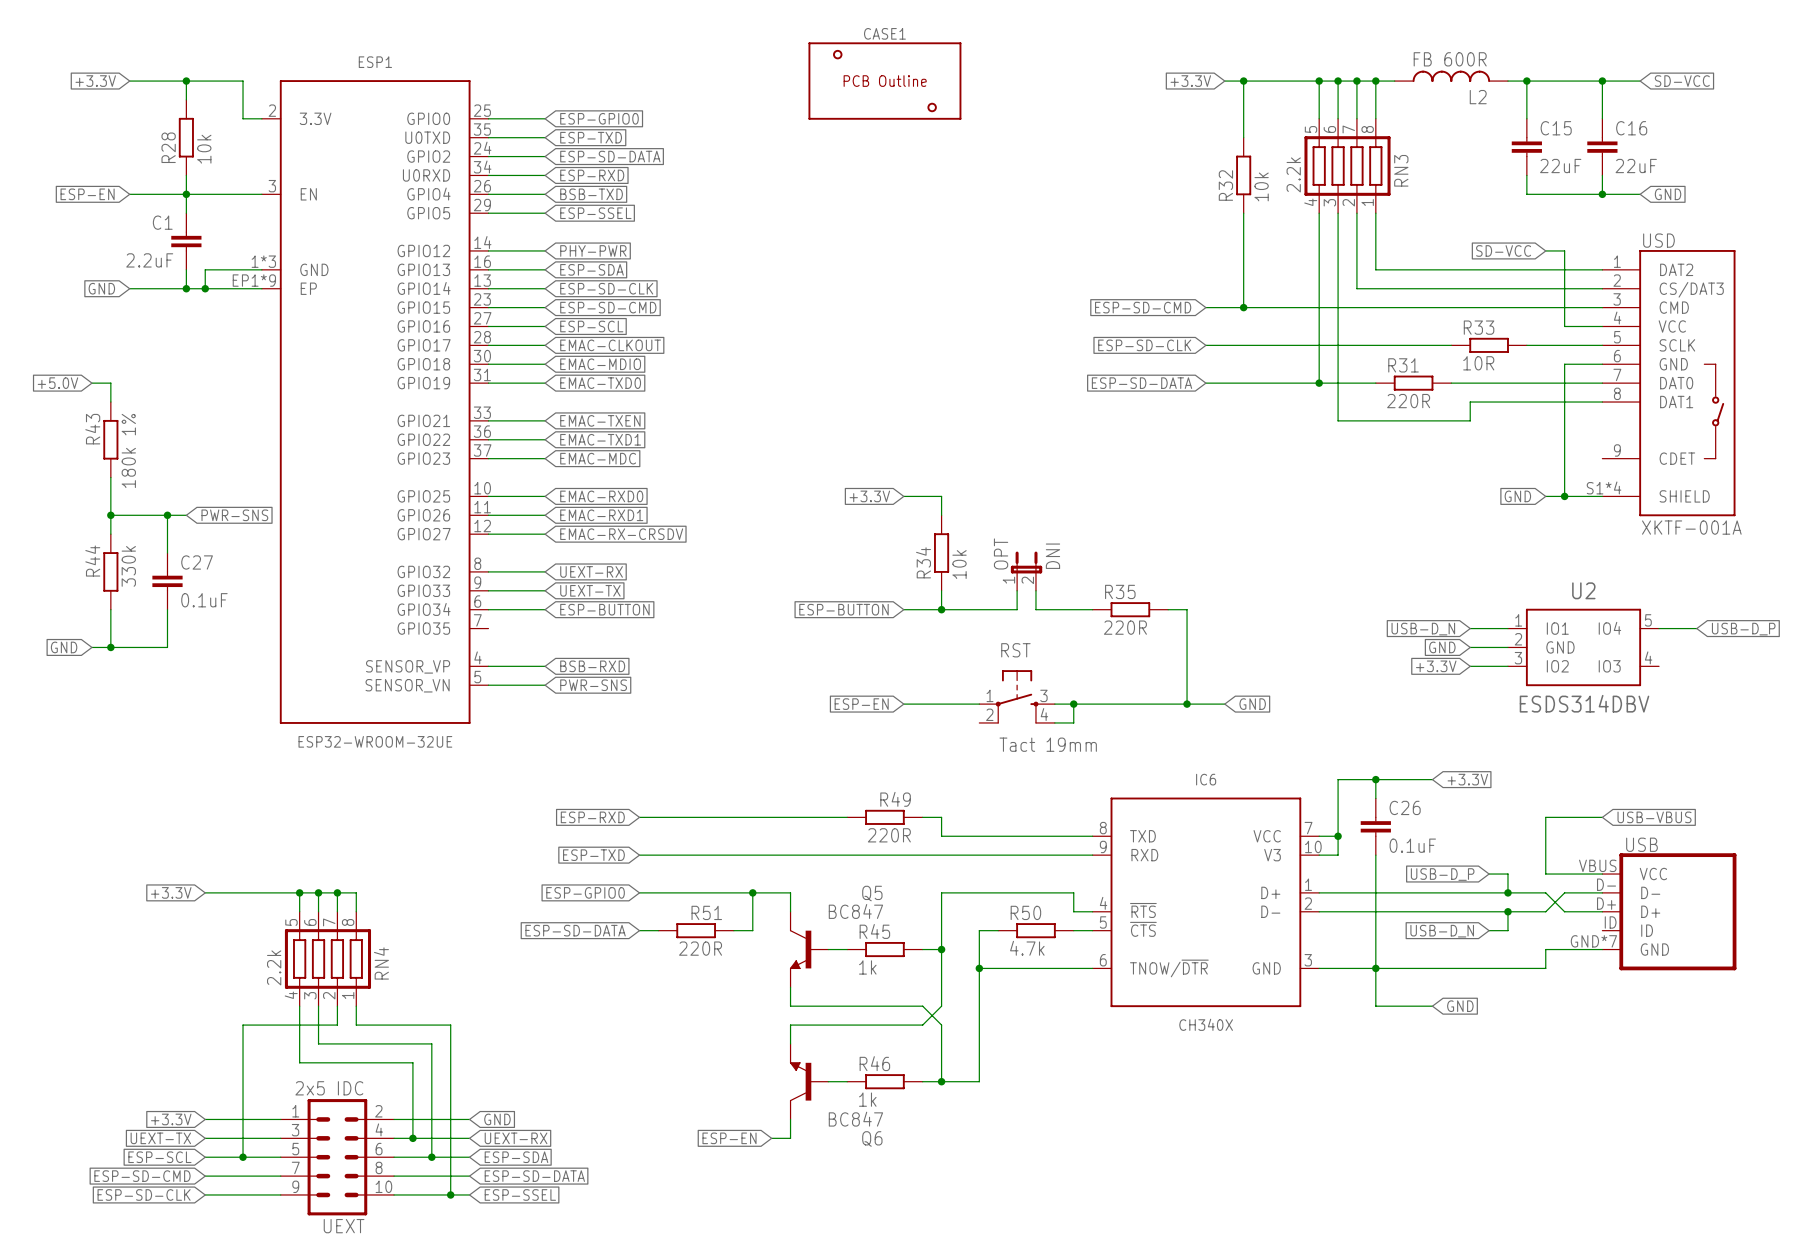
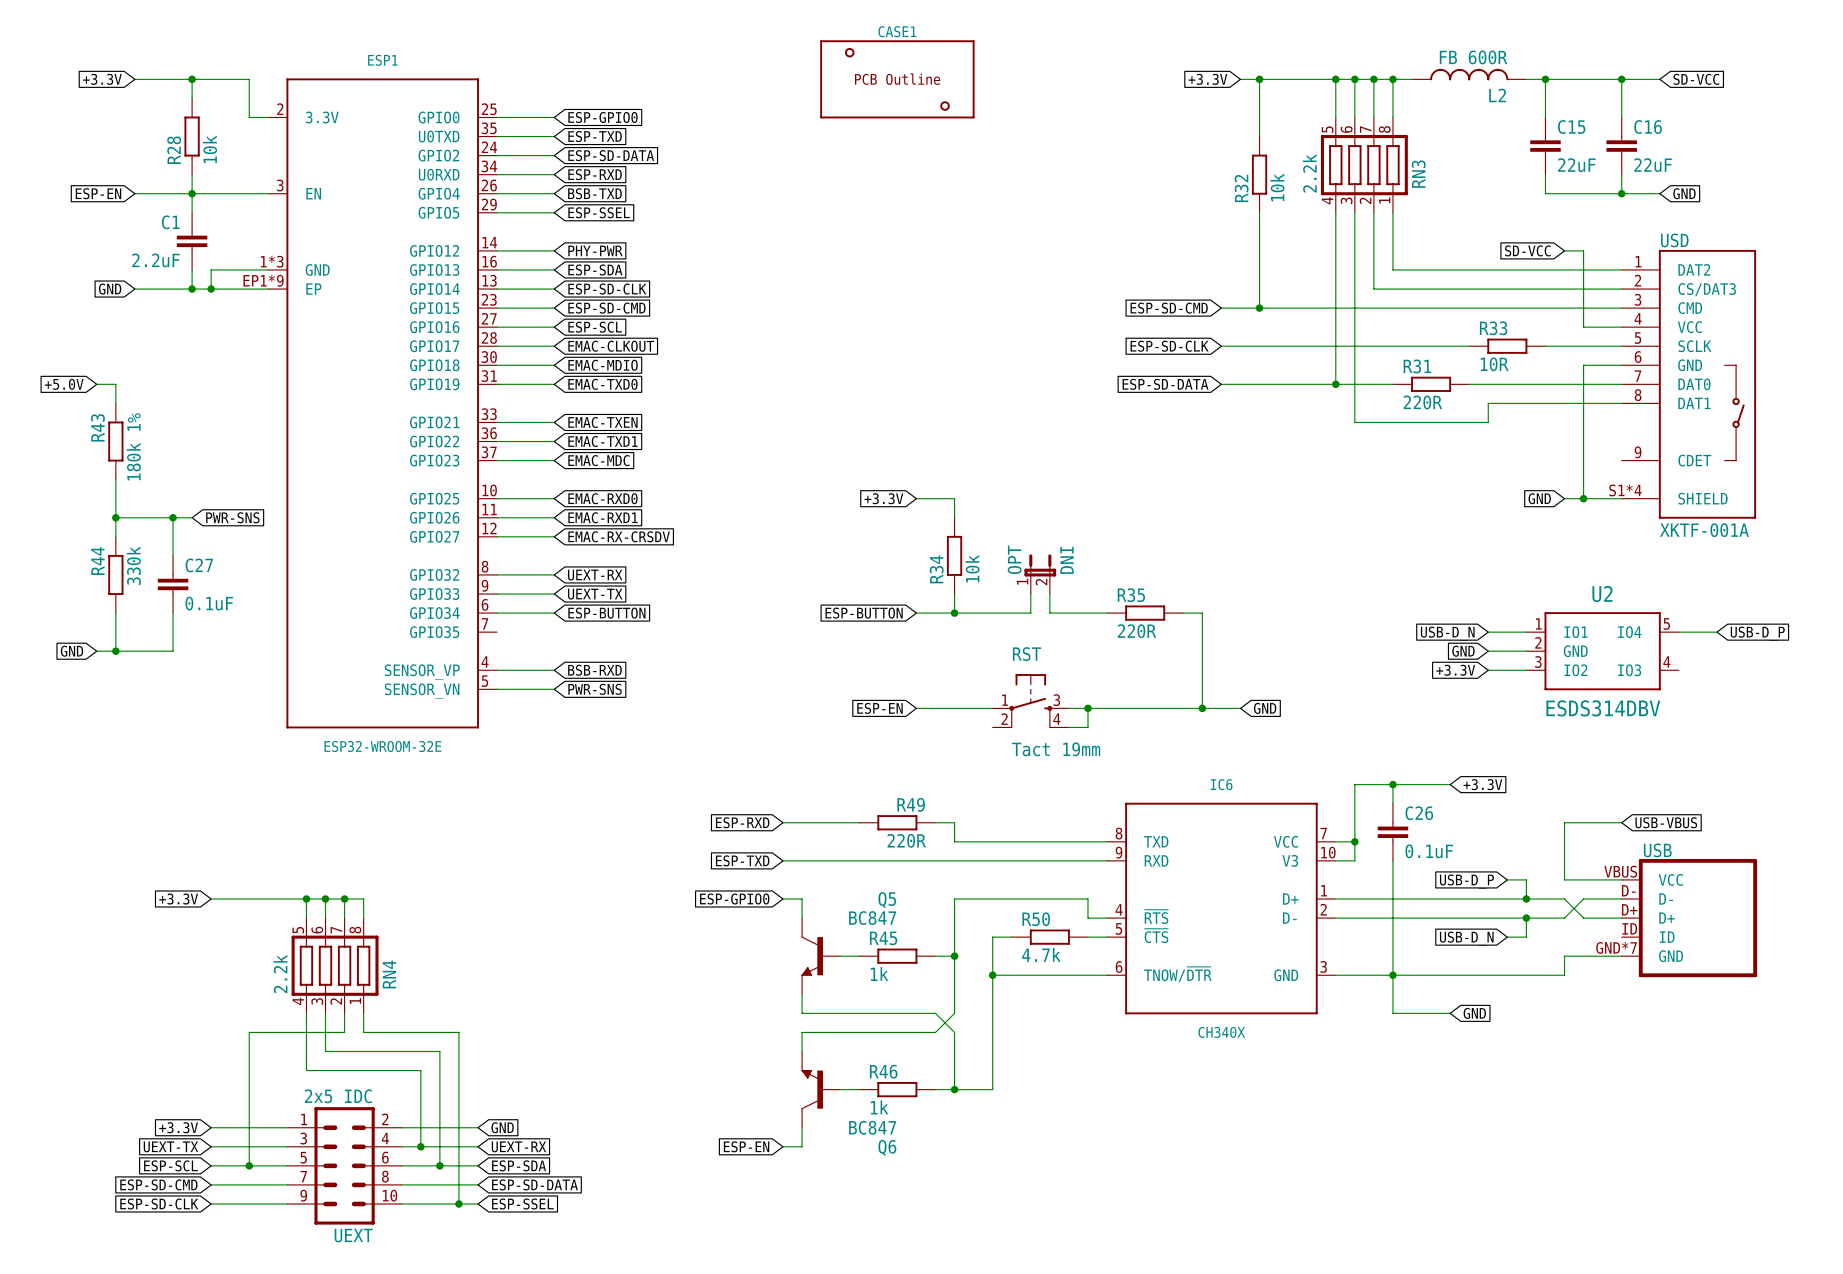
ESP1 value: ESP32-WROOM-32UE (375, 741) -> ESP32-WROOM-32E (382, 746)
global label position: ESP-RXD (592, 817) -> ESP-RXD (742, 822)
wire: (639, 817) (771, 817) -> none
global label position: ESP-TXD (593, 855) -> ESP-TXD (742, 860)
wire: (639, 855) (771, 855) -> none
global label position: ESP-GPIO0 (585, 892) -> ESP-GPIO0 (734, 899)
wire: (639, 892) (771, 892) -> none
wire: (752, 892) (752, 930) (733, 930) -> none
junction: (752, 892) -> none
global label: ESP-SD-DATA (575, 930) -> none
wire: (639, 930) (658, 930) -> none
R51: 220R (696, 930) -> none

